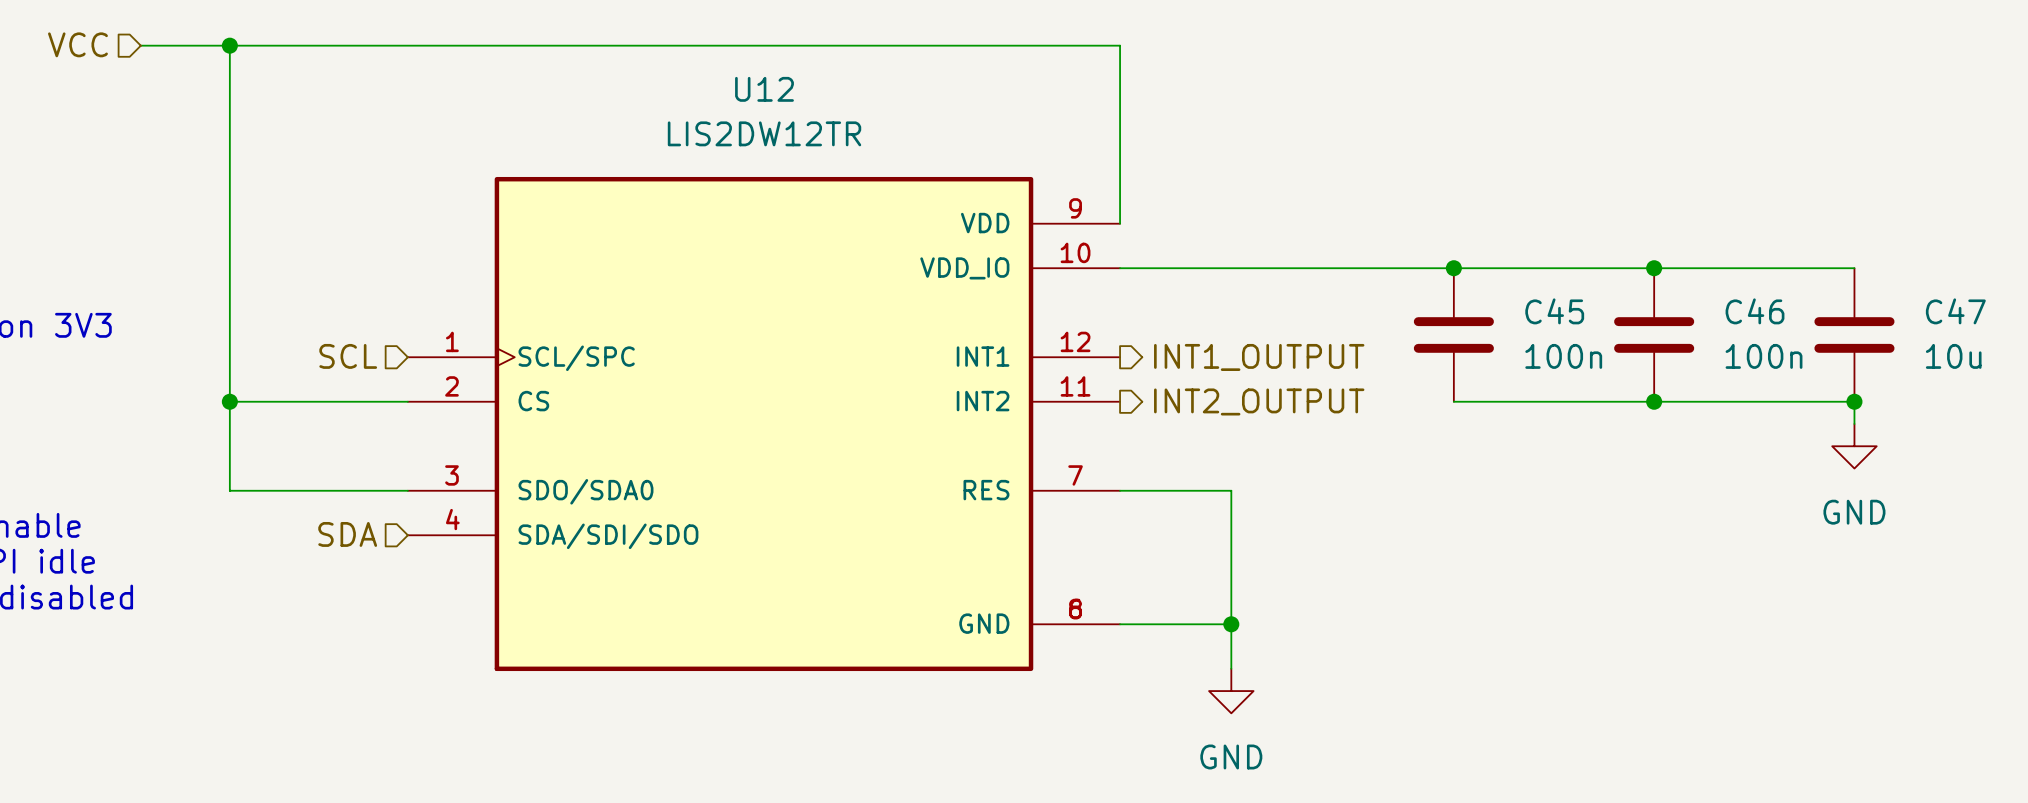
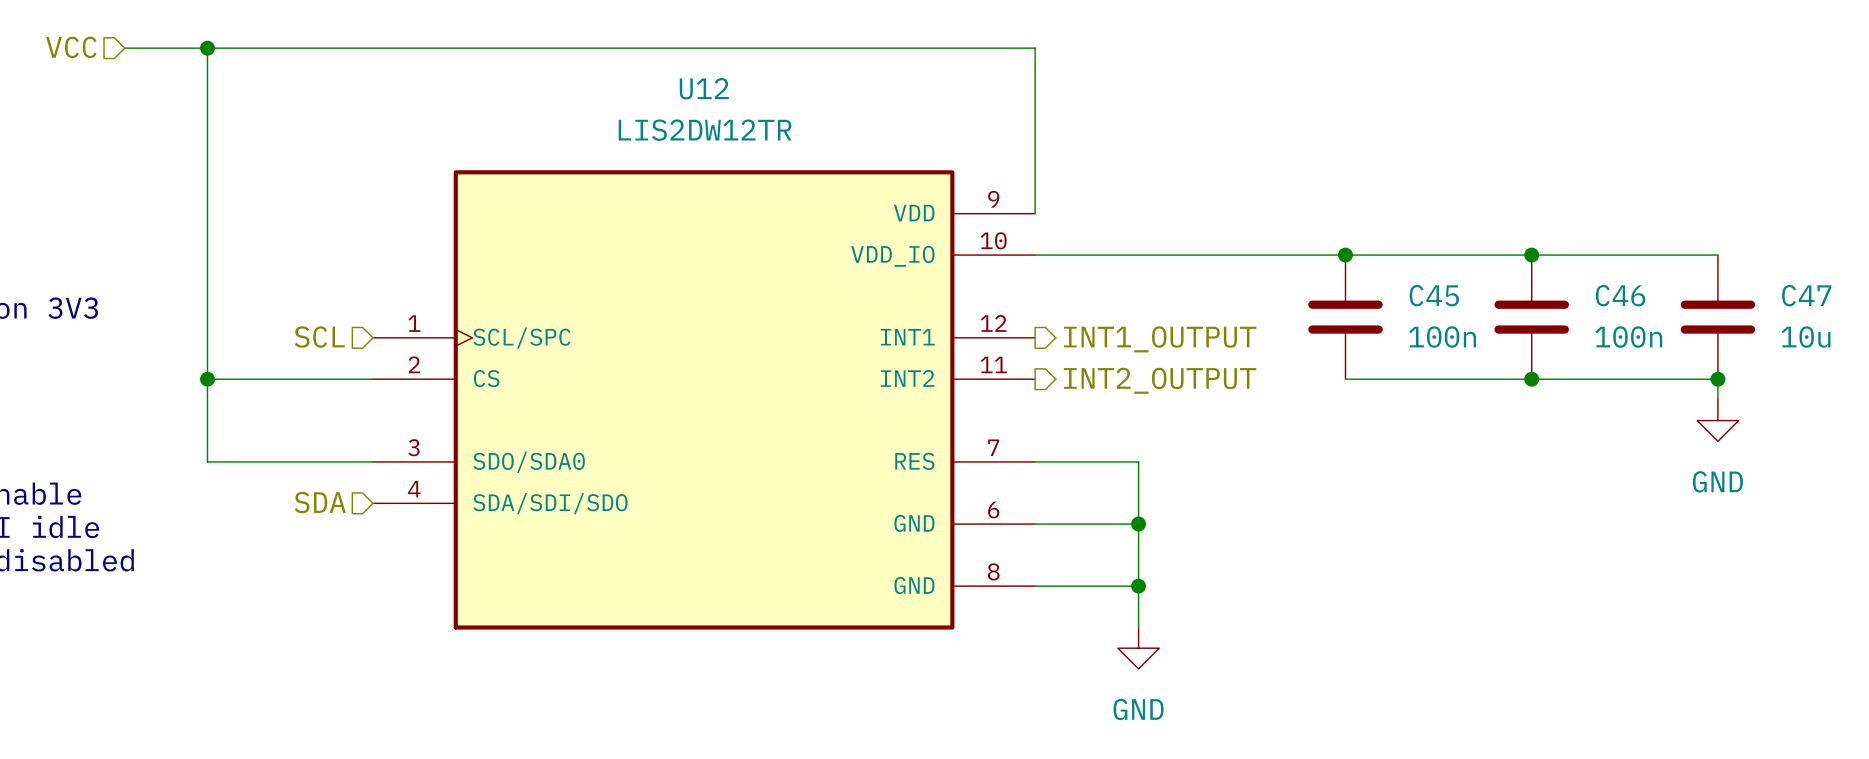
U12 symbol: [407, 176, 1121, 672] -> [373, 170, 1036, 630]
wire: none -> (1035, 524) (1138, 524)
junction: none -> (1138, 524)

